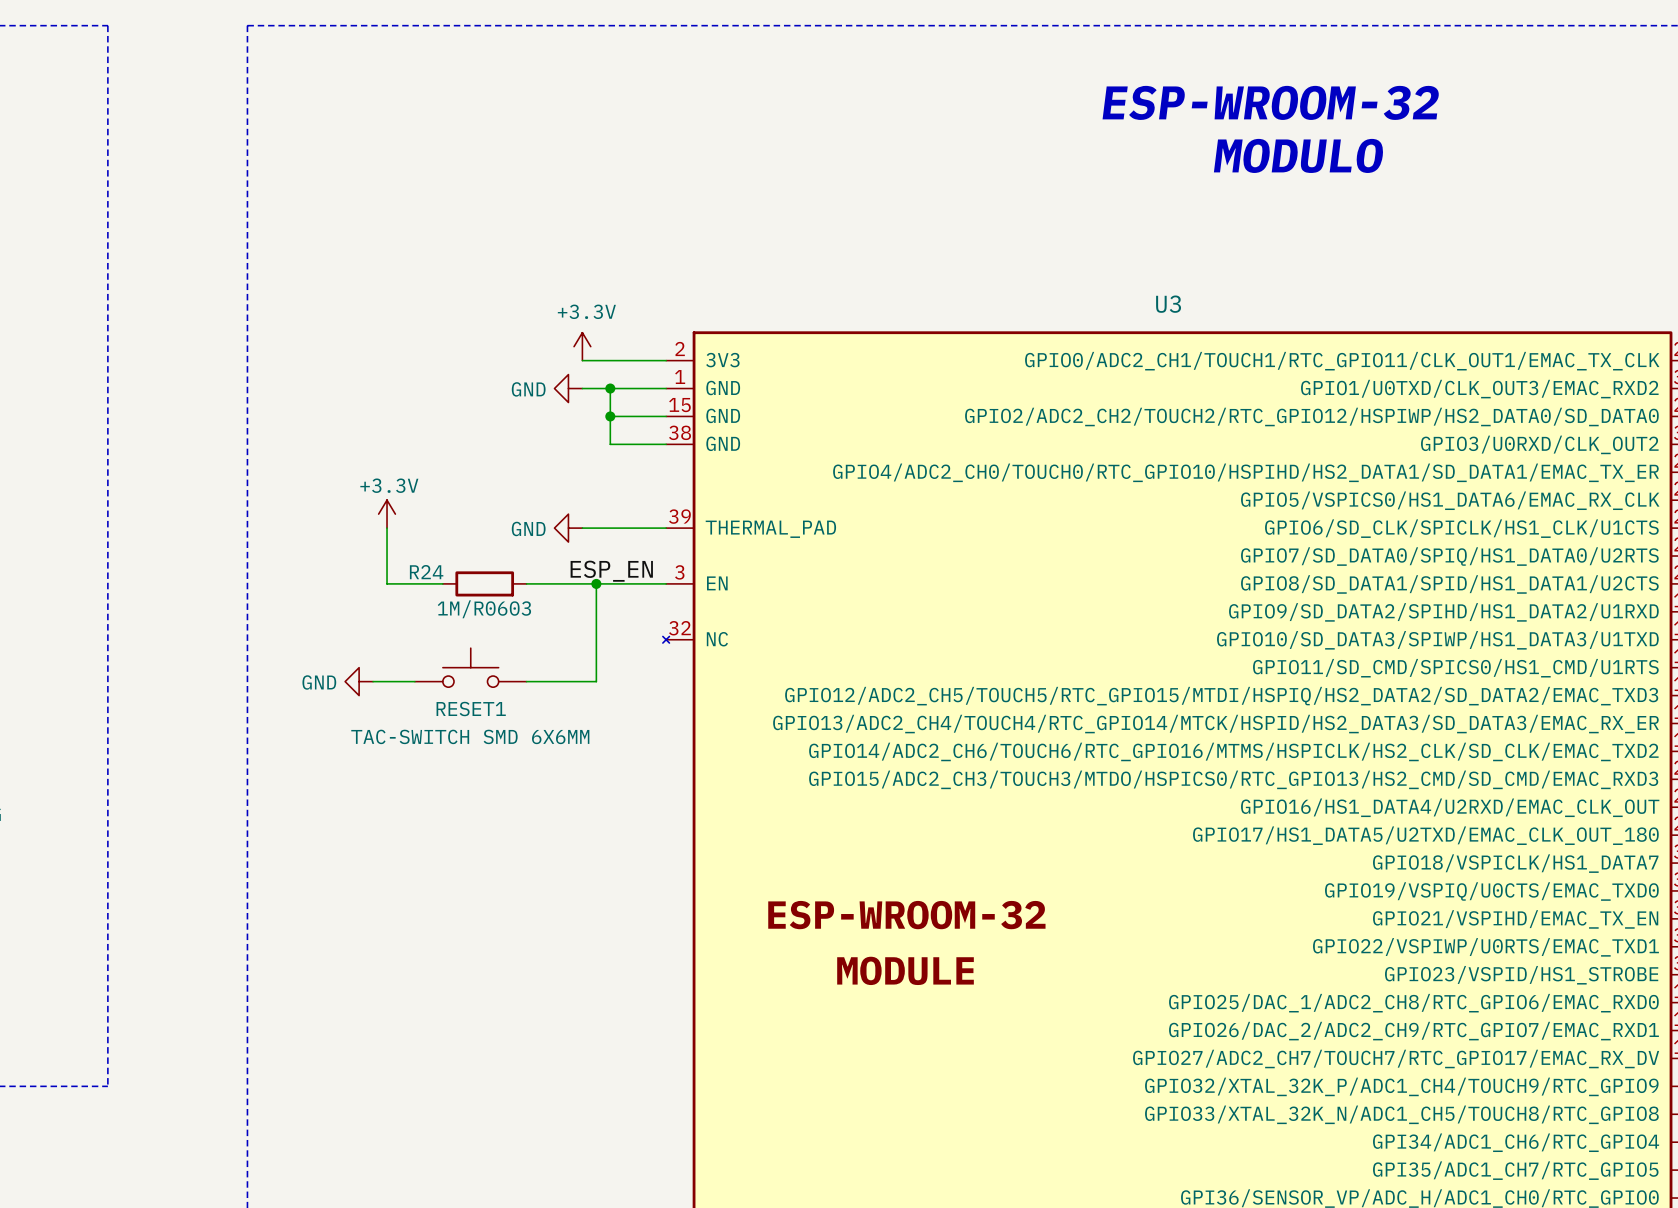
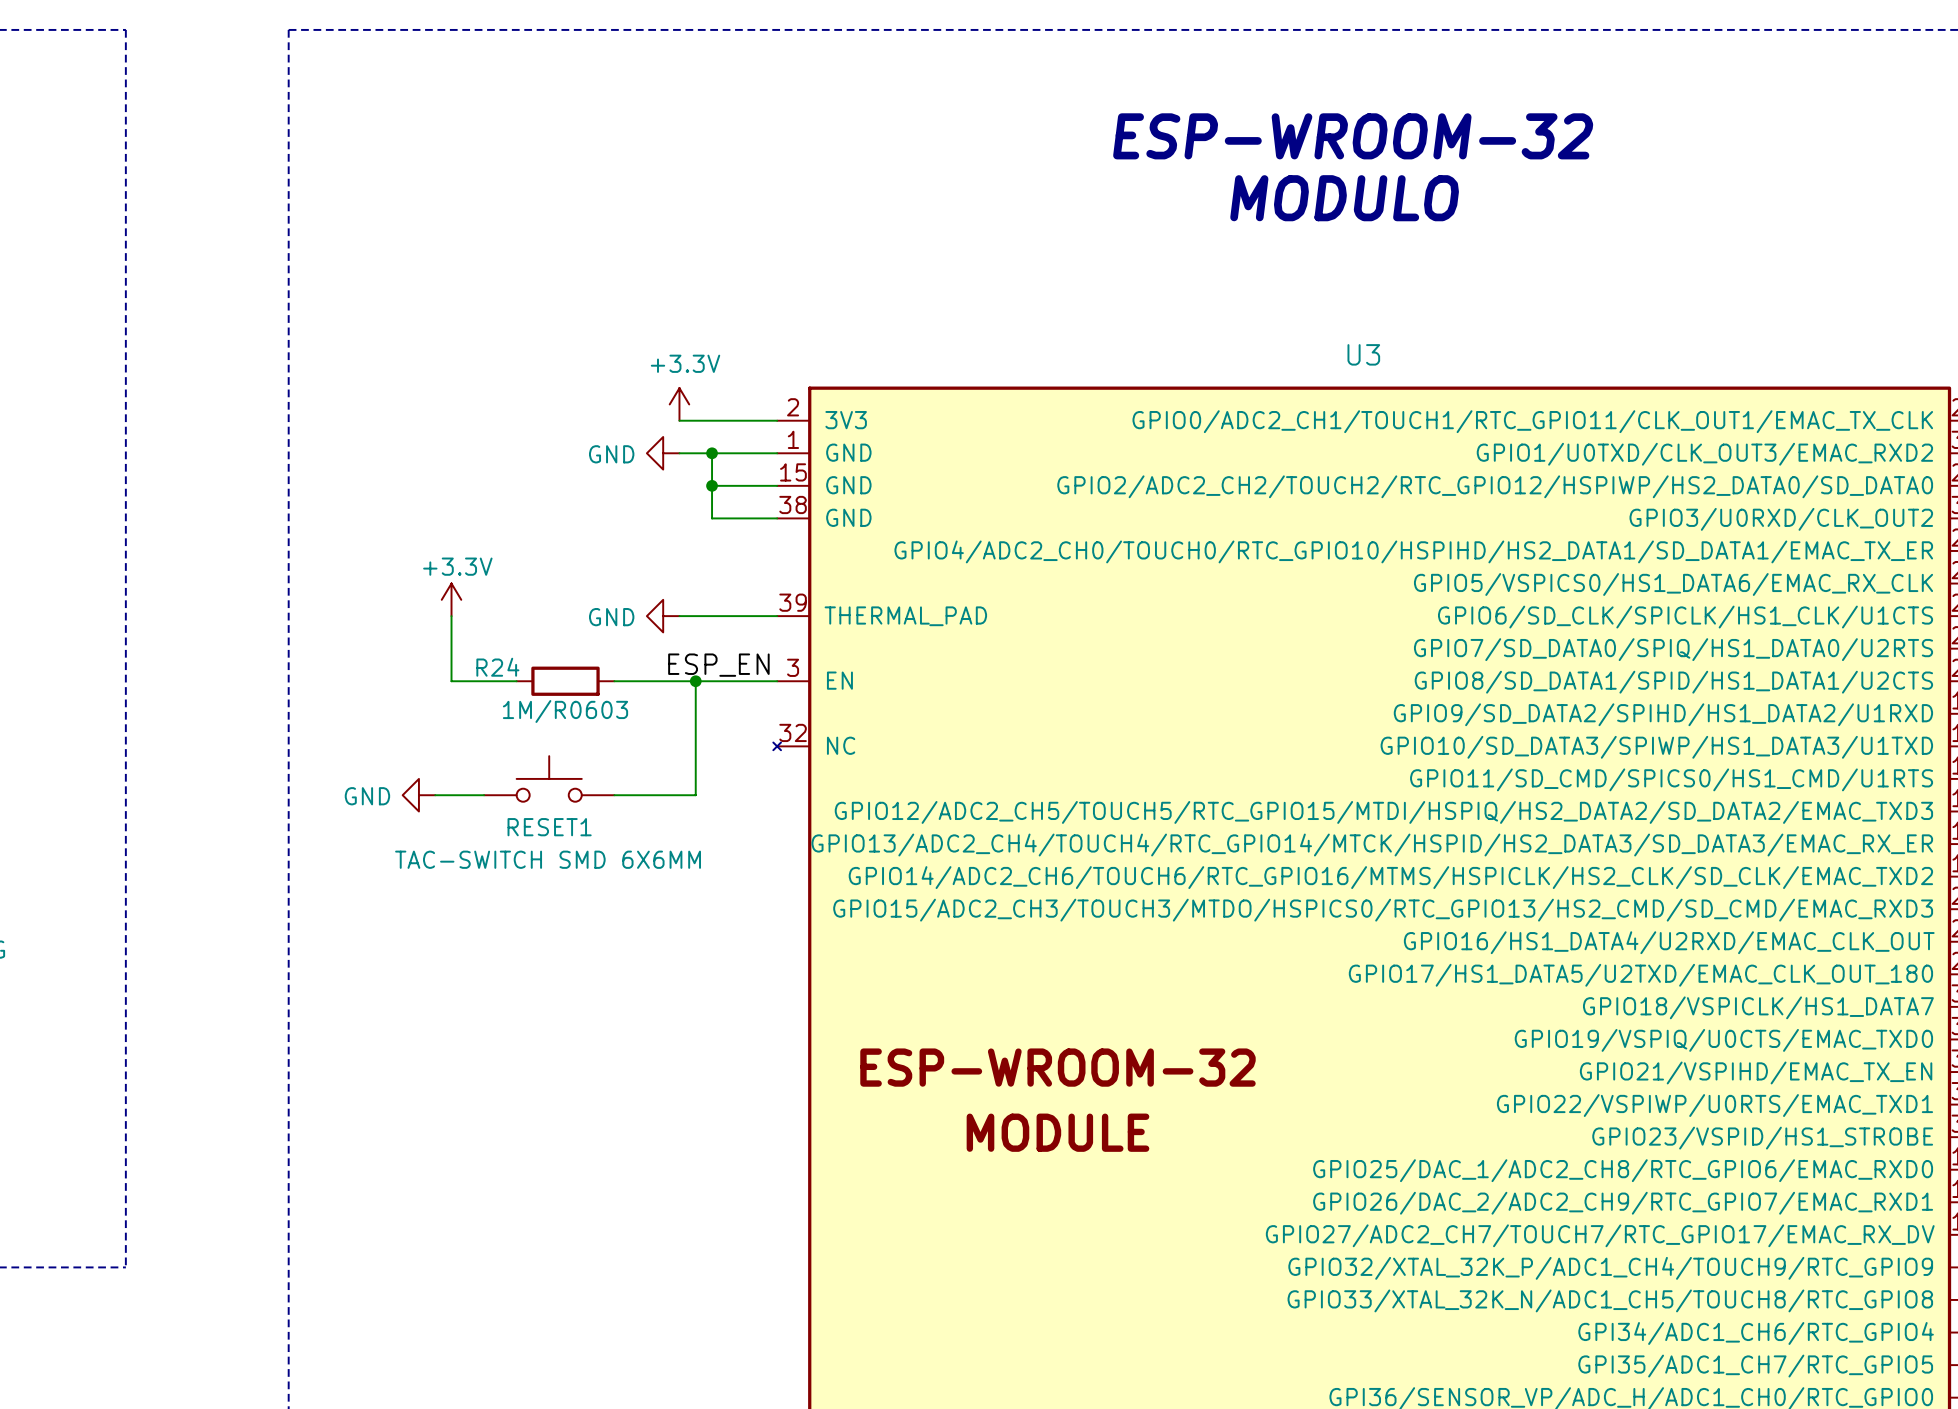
text position: ESP-WROOM-32 (1270, 102) -> ESP-WROOM-32 (1353, 136)
text position: MODULO (1298, 155) -> MODULO (1344, 198)

